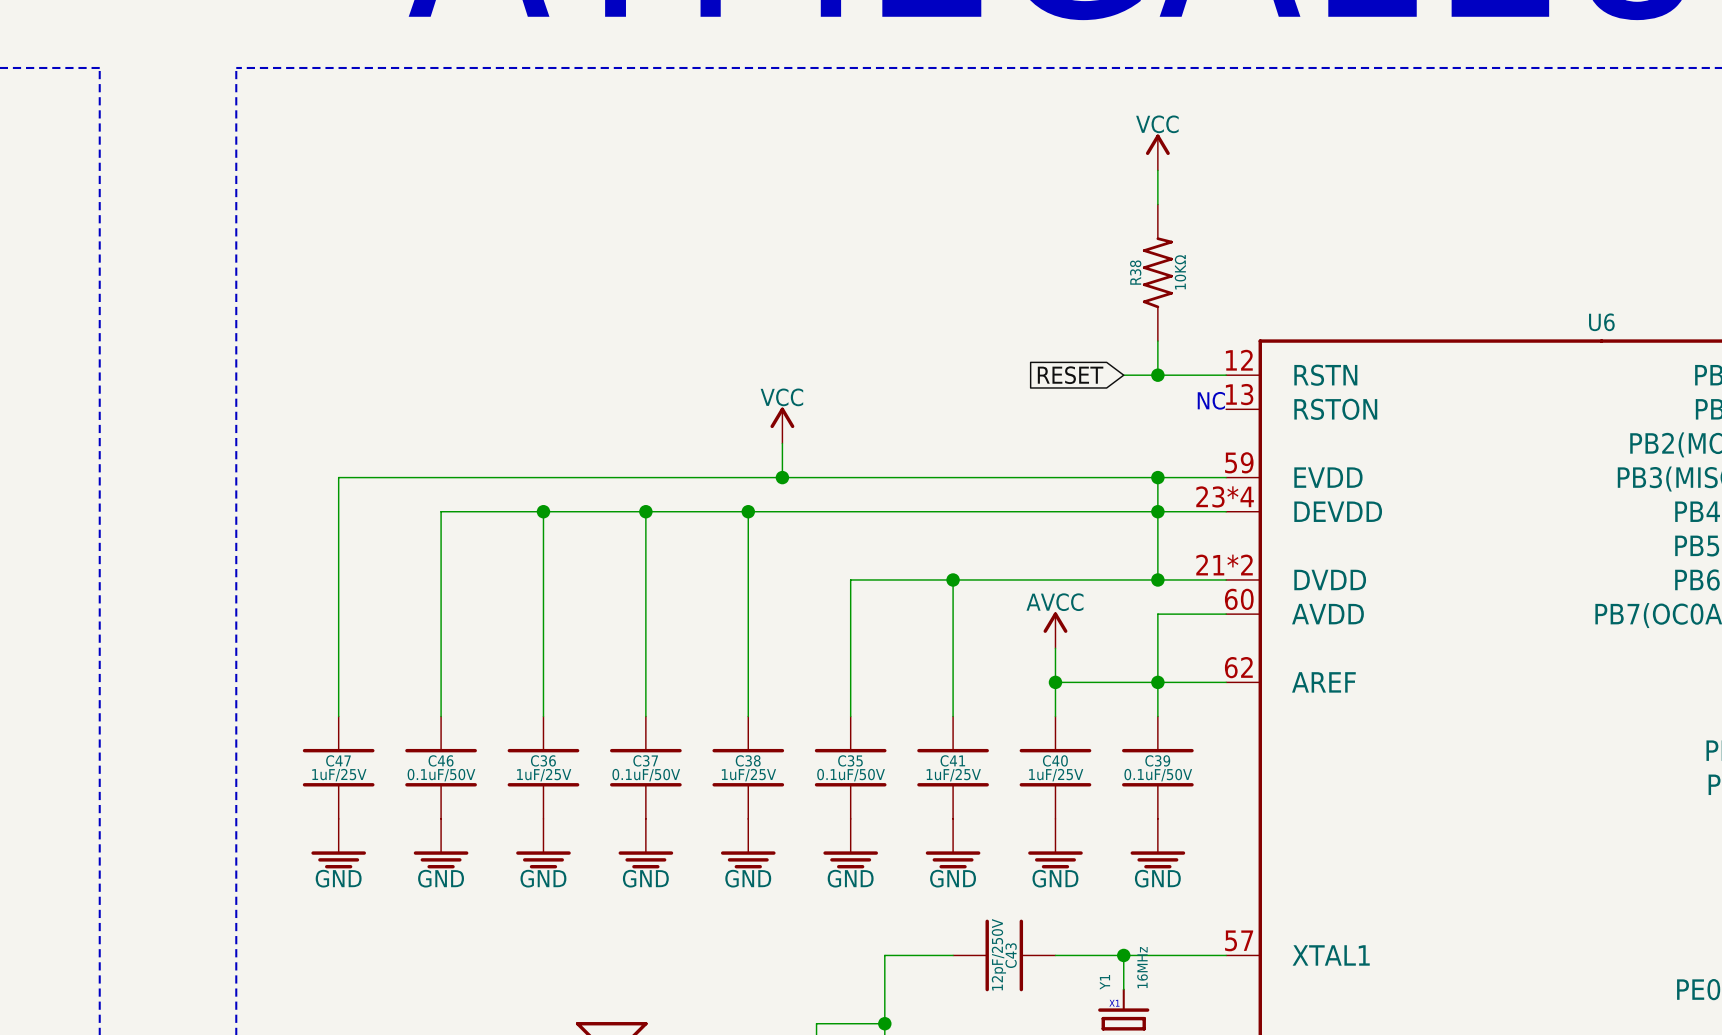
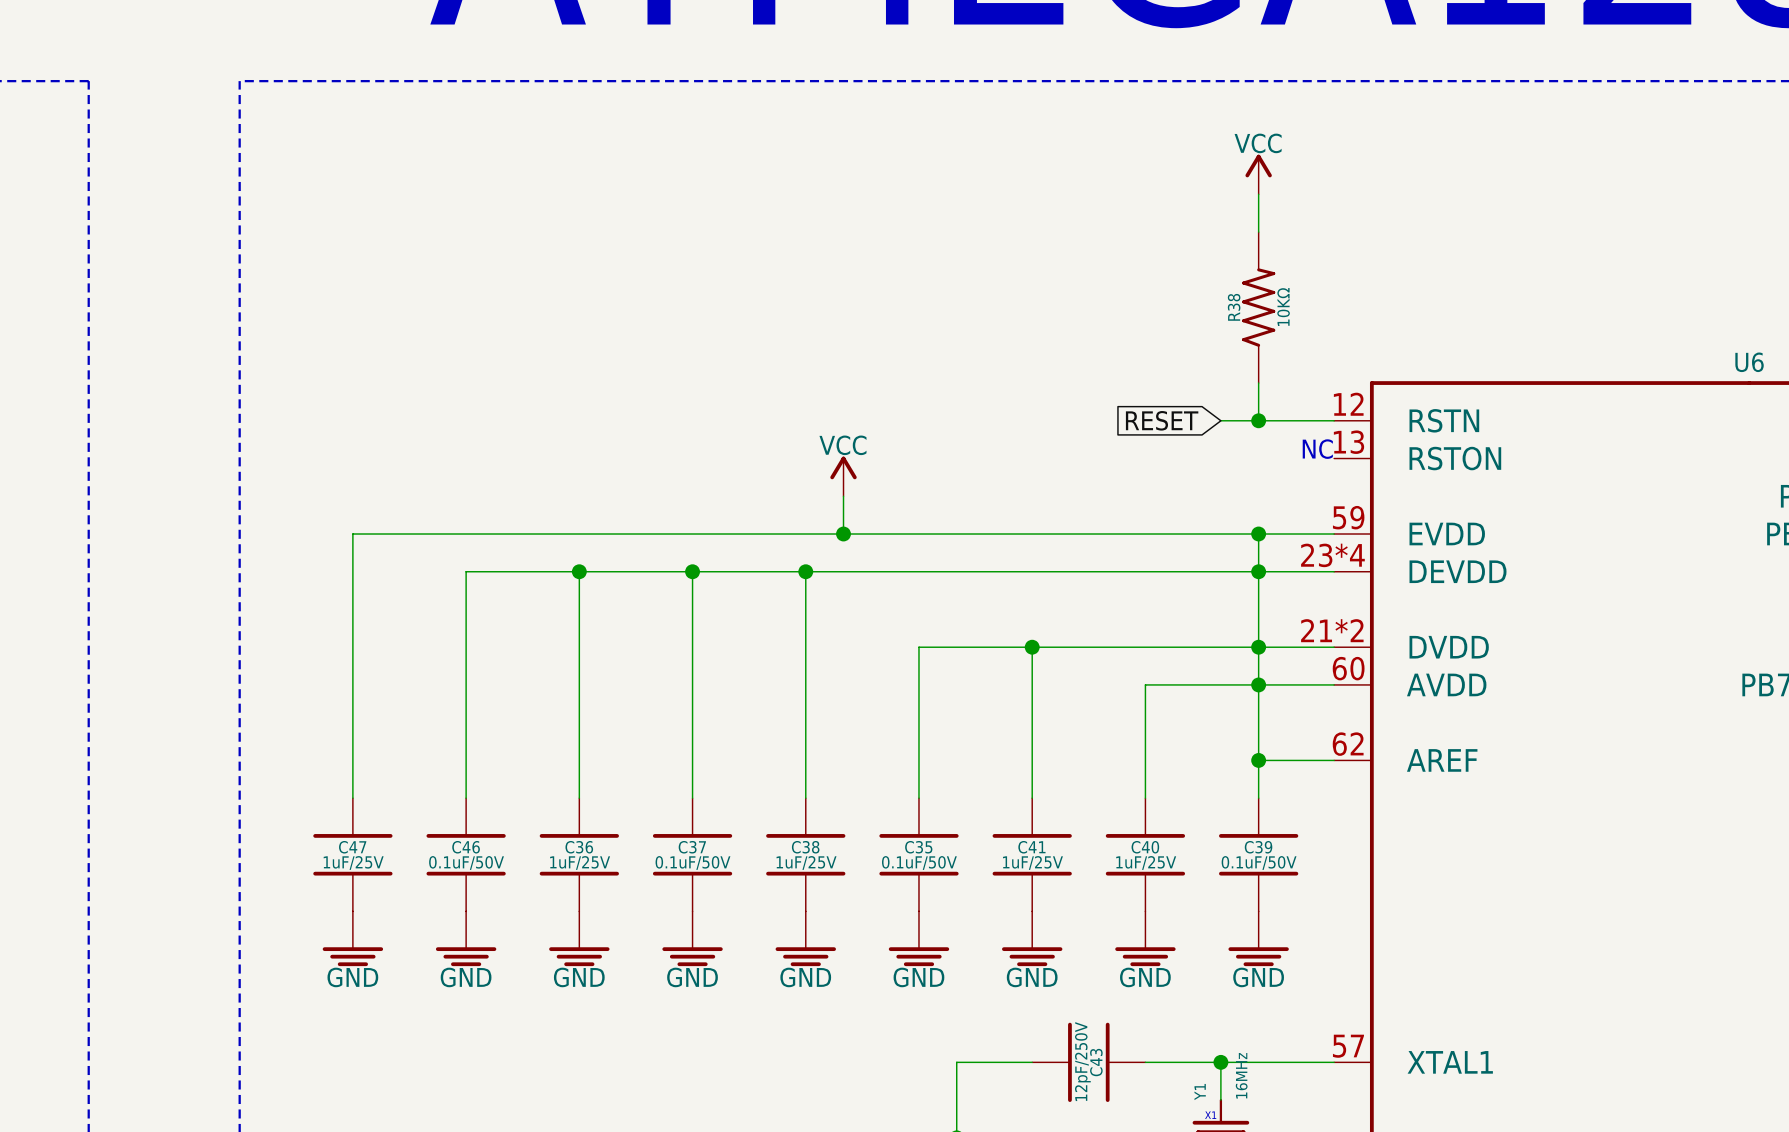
wire: none -> (1258, 647) (1258, 684) (1145, 684) (1145, 722)
junction: none -> (1258, 684)
power symbol: (1055, 630) -> none
wire: (1055, 682) (1157, 682) -> none
junction: (1055, 682) -> none

